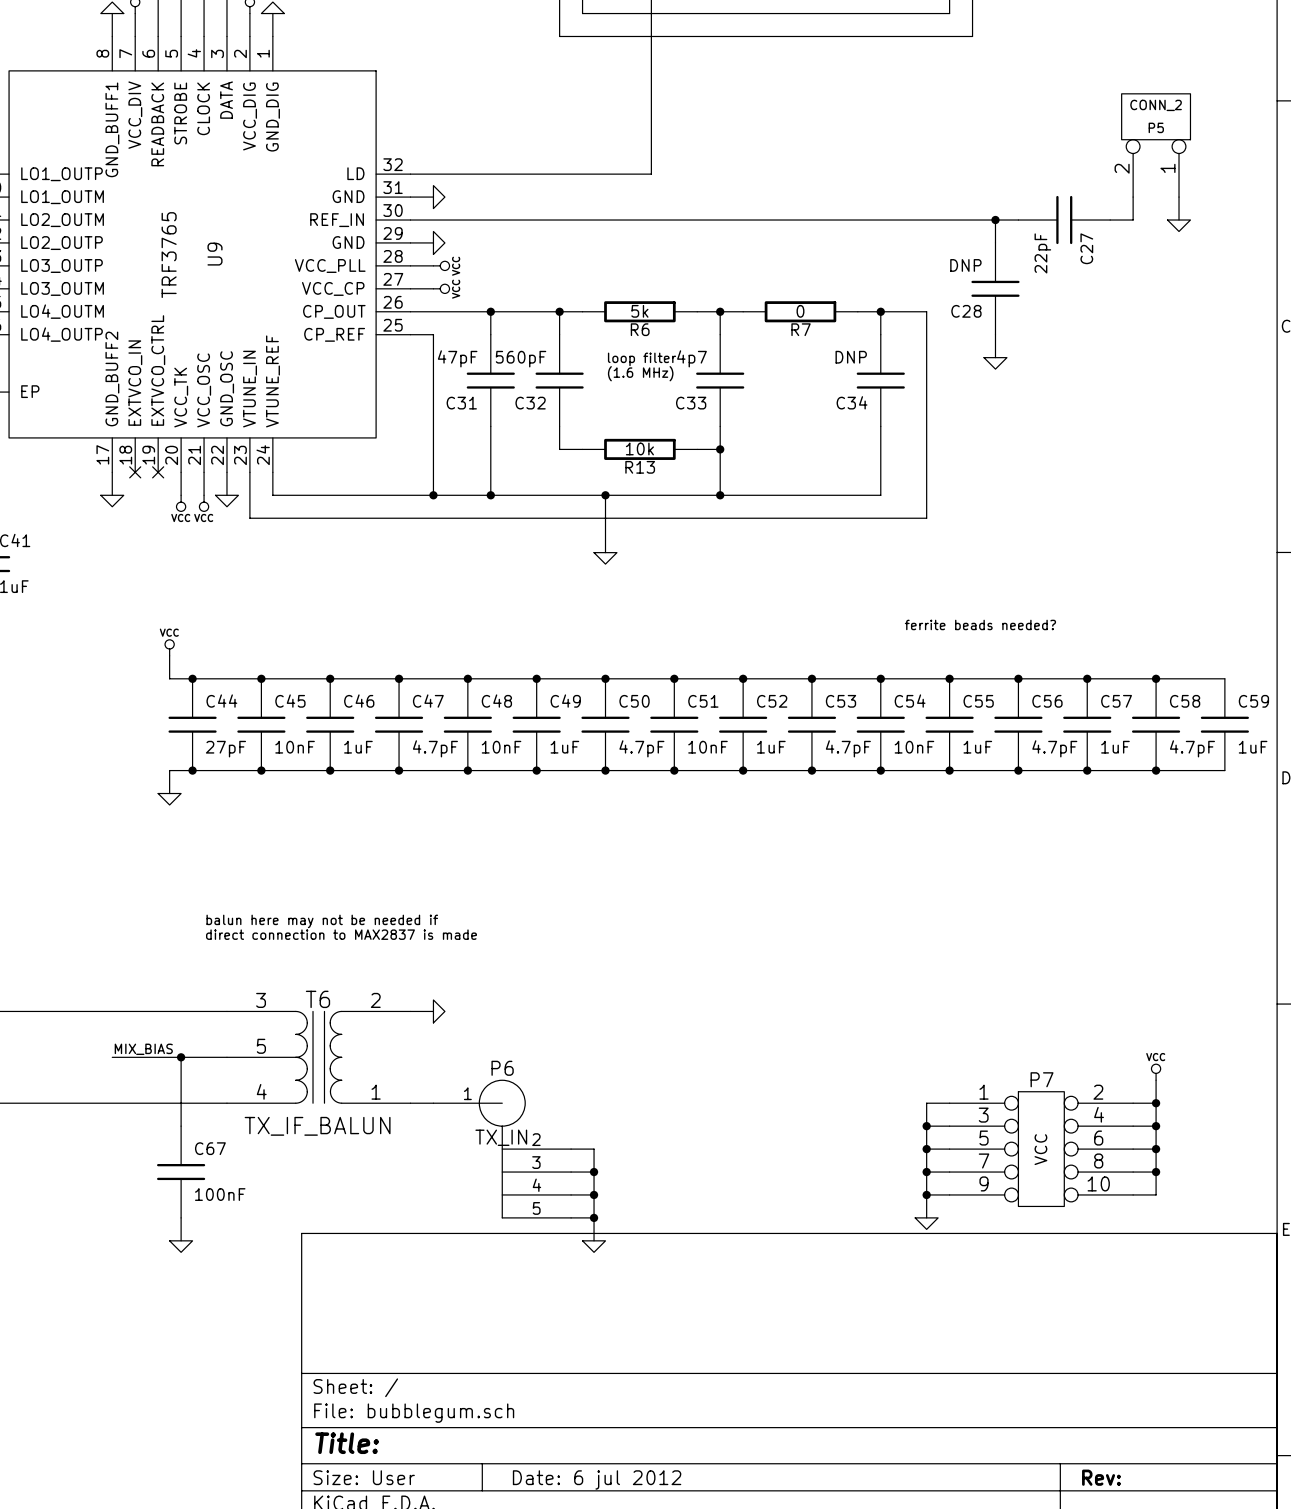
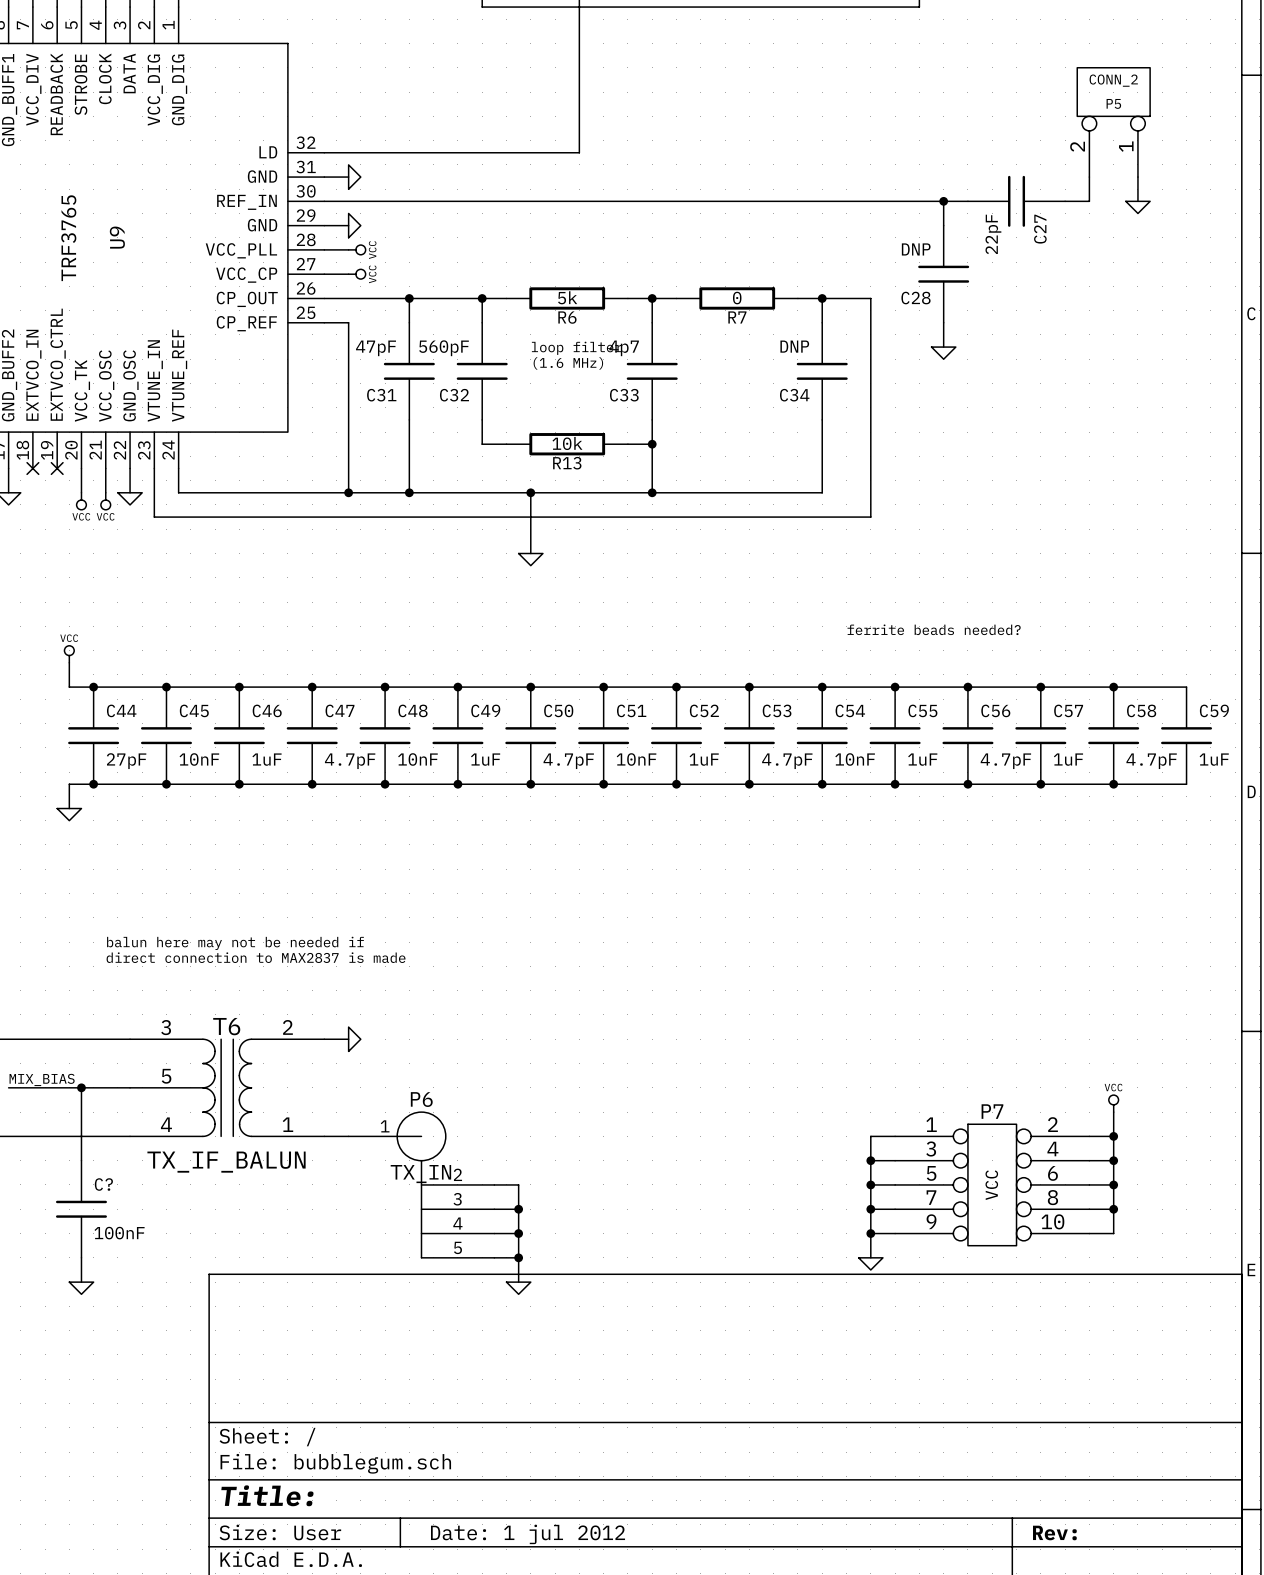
C67 name: C67 (210, 1148) -> C? (103, 1184)
title block: Date: 6 jul 2012 (597, 1479) -> Date: 1 jul 2012 (528, 1534)

